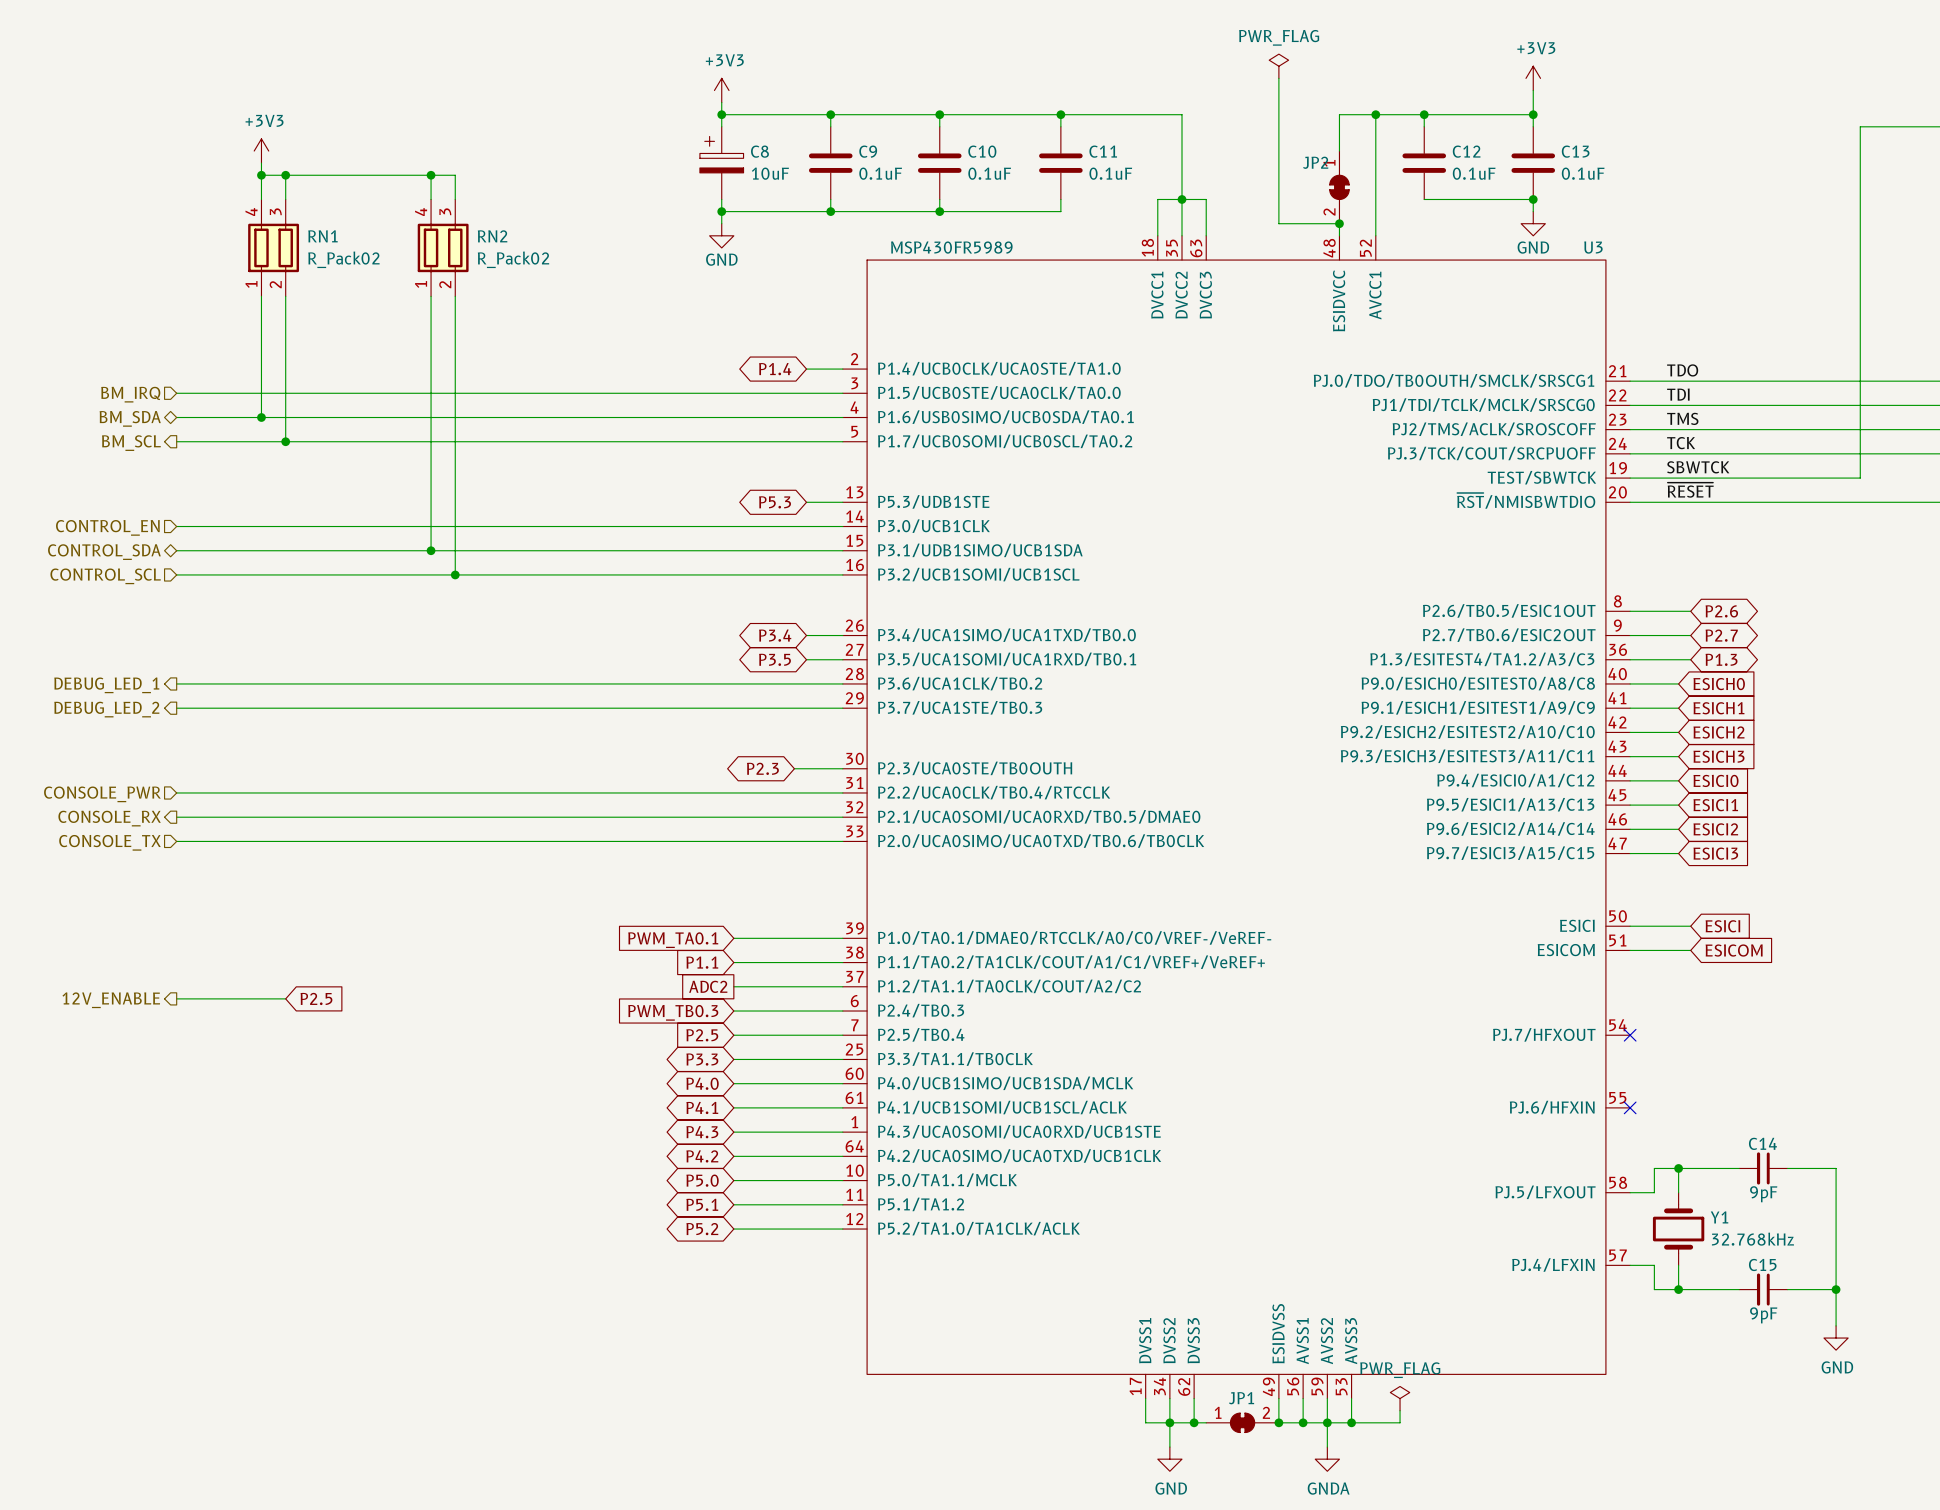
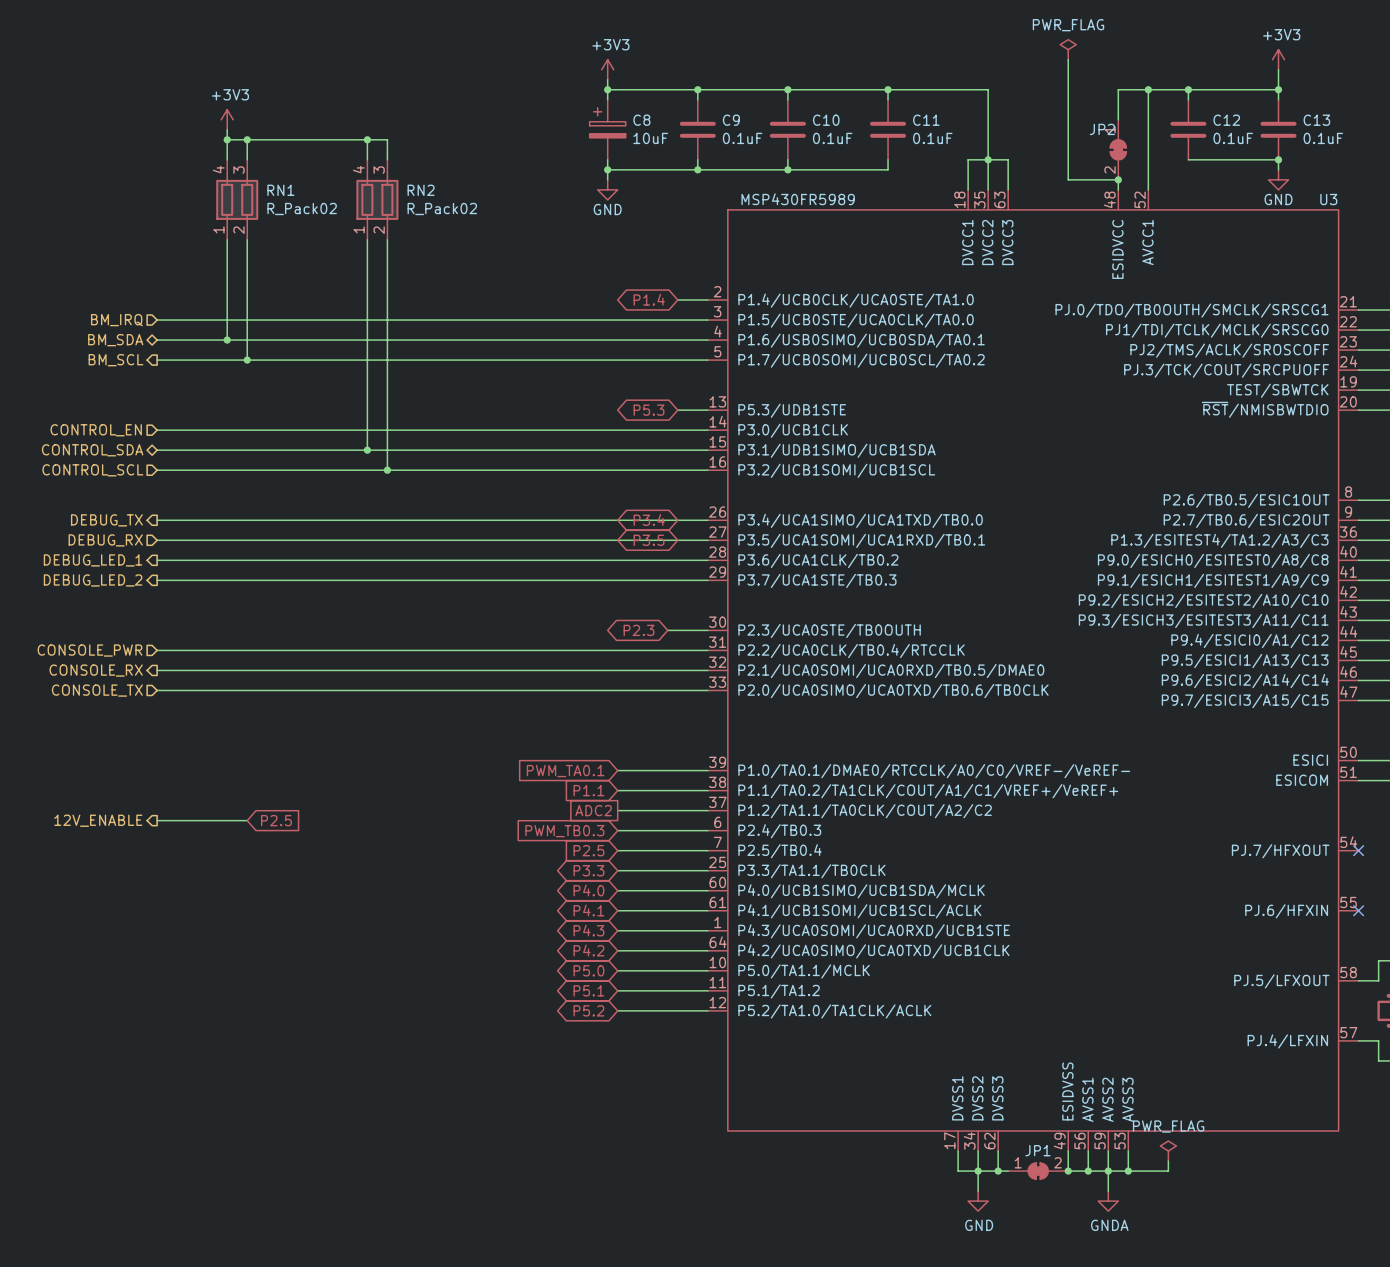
wire: none -> (157, 520) (677, 520)
hierarchical label: none -> DEBUG_TX (106, 520)
wire: none -> (157, 540) (677, 540)
hierarchical label: none -> DEBUG_RX (105, 540)

